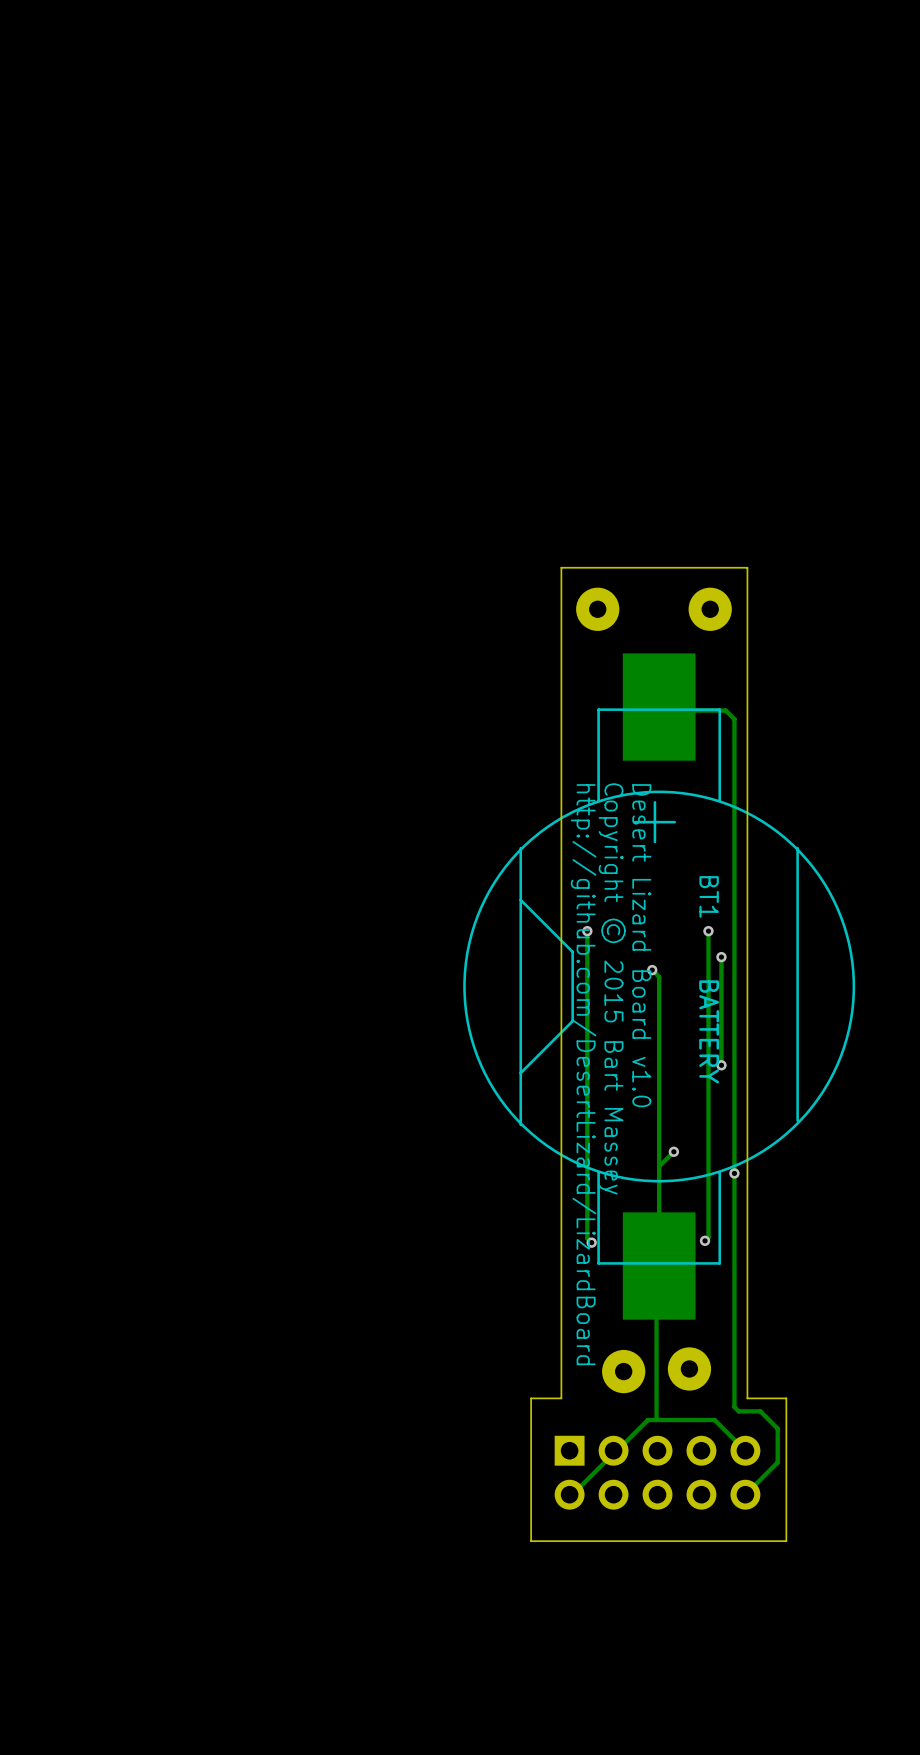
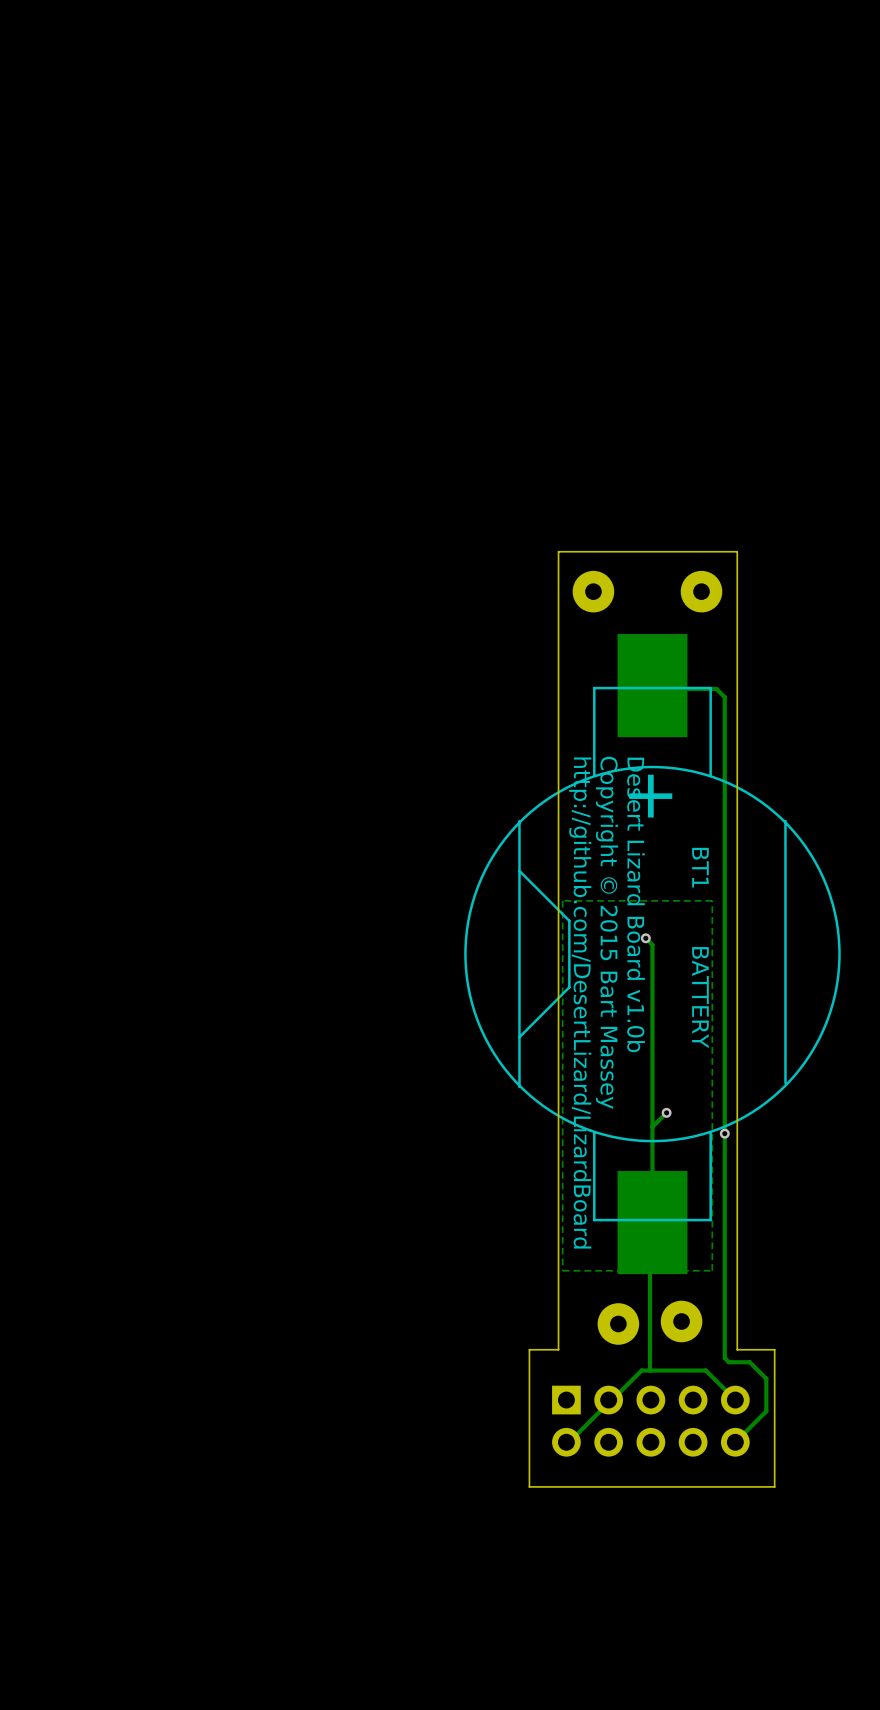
track: (587, 931) (587, 1238) (591, 1242) -> none
via: (587, 931) -> none
track: (708, 931) (708, 1237) (705, 1240) -> none
via: (708, 931) -> none
zone outline: none -> (712, 900) (712, 1270) (562, 1270) (562, 900) (712, 900)
text: Desert Lizard Board v1.0 (641, 945) -> Desert Lizard Board v1.0b (635, 904)
track: (721, 957) (721, 1065) -> none
via: (721, 957) -> none
via: (721, 1065) -> none
via: (705, 1240) -> none
via: (591, 1242) -> none

